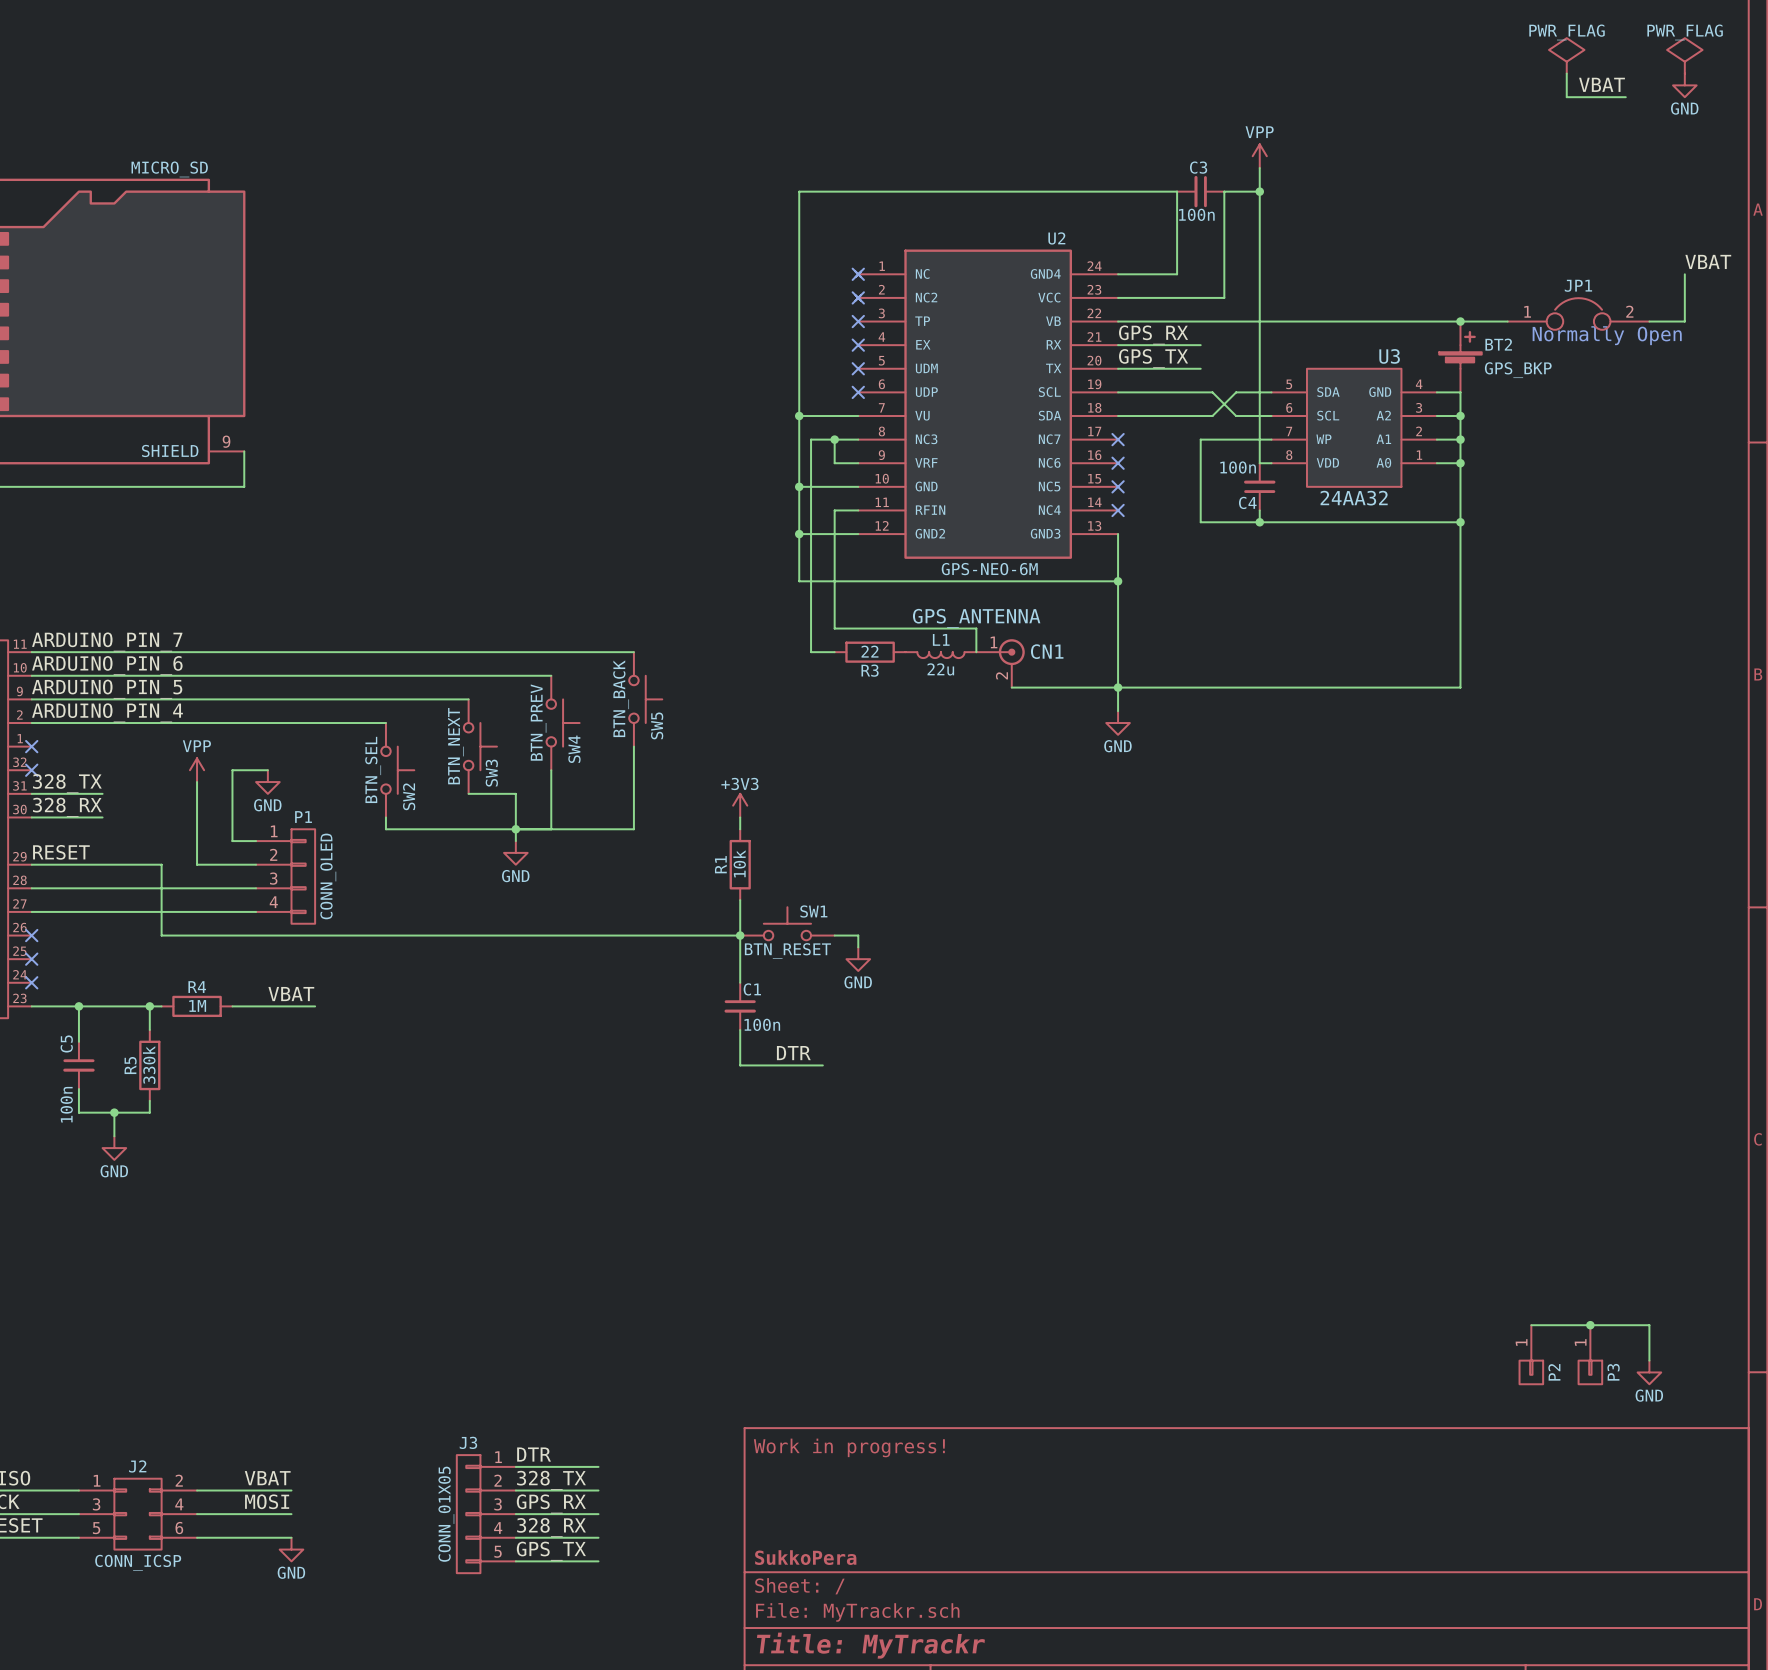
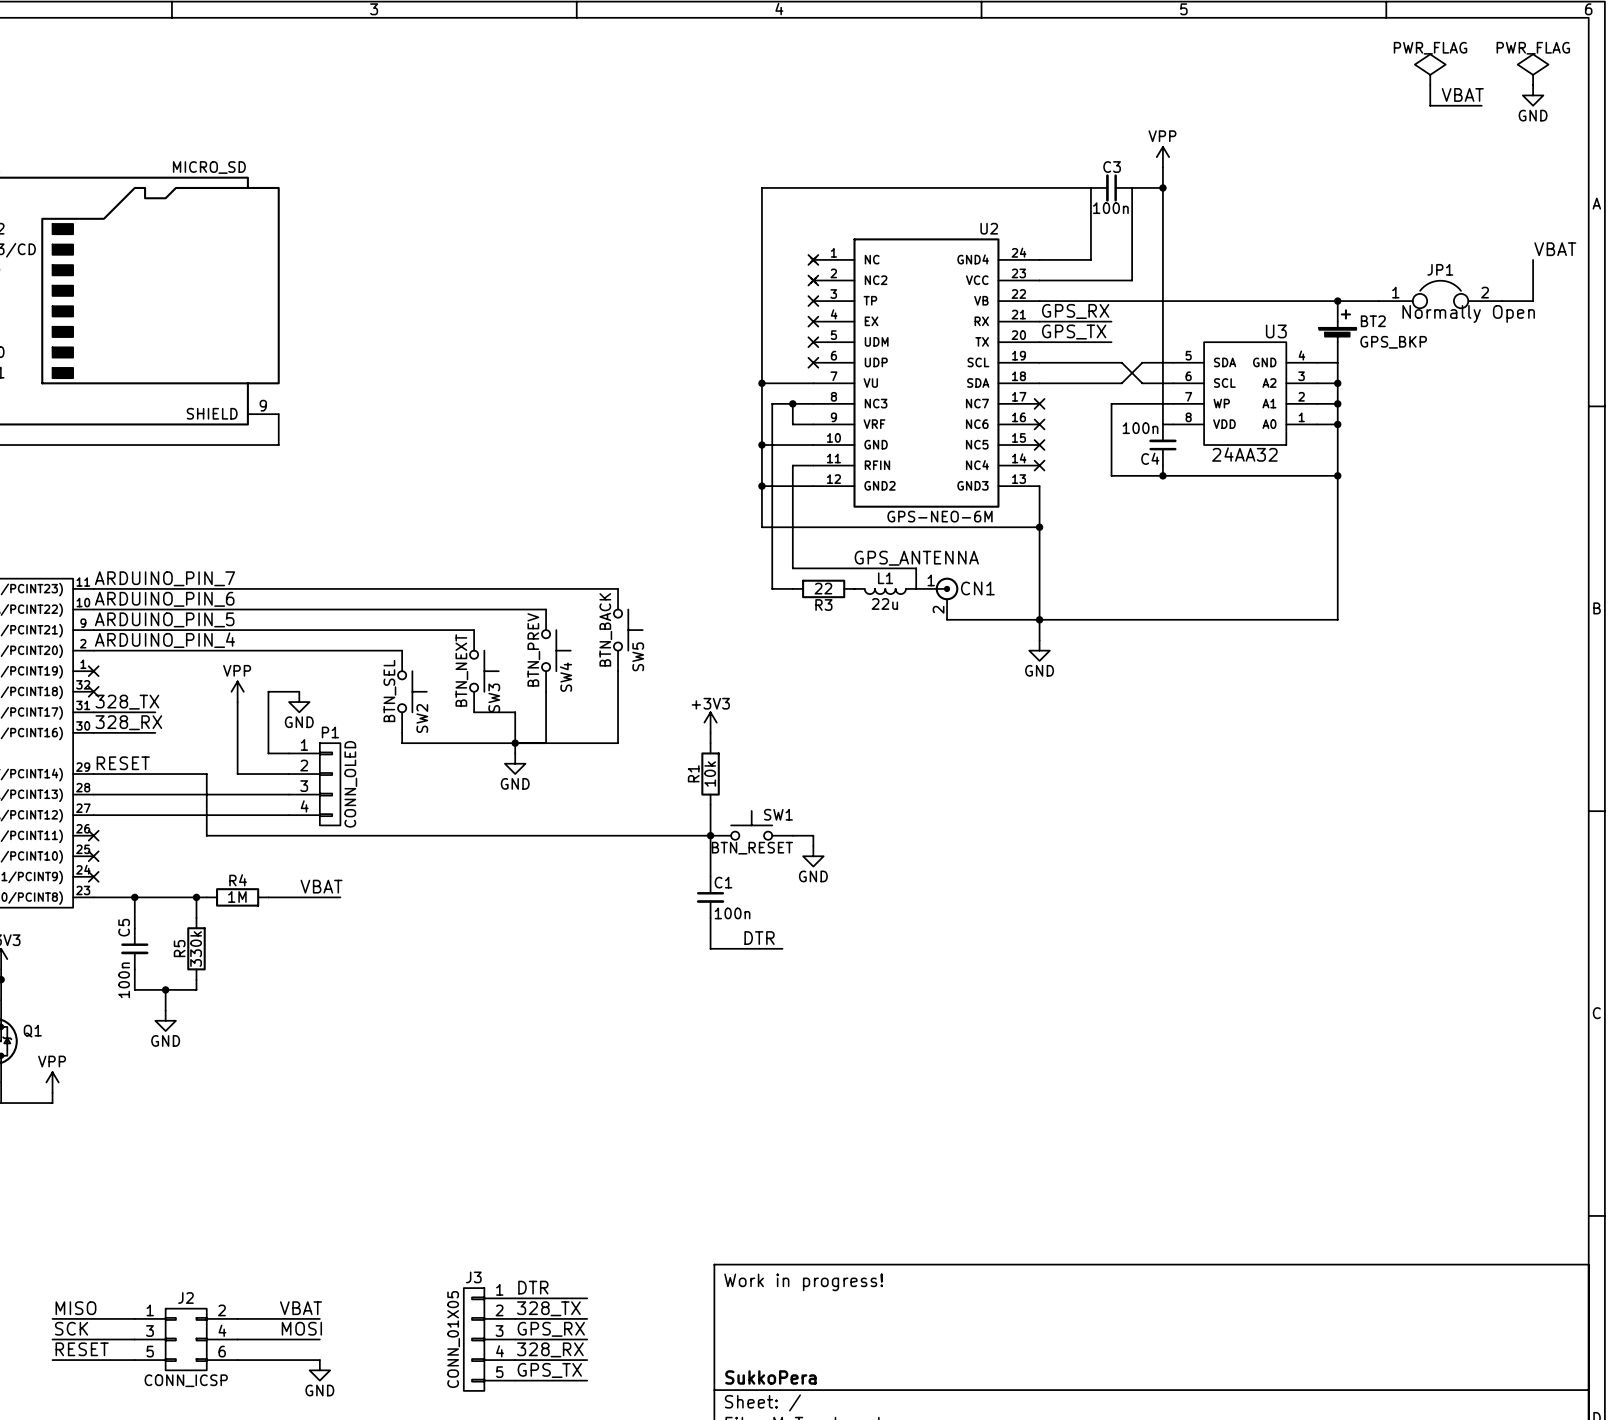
wire: (1531, 1325) (1649, 1325) (1649, 1360) -> none
junction: (1590, 1325) -> none
P2: (1531, 1354) -> none
P3: (1590, 1354) -> none
power symbol: GND (1649, 1372) -> none

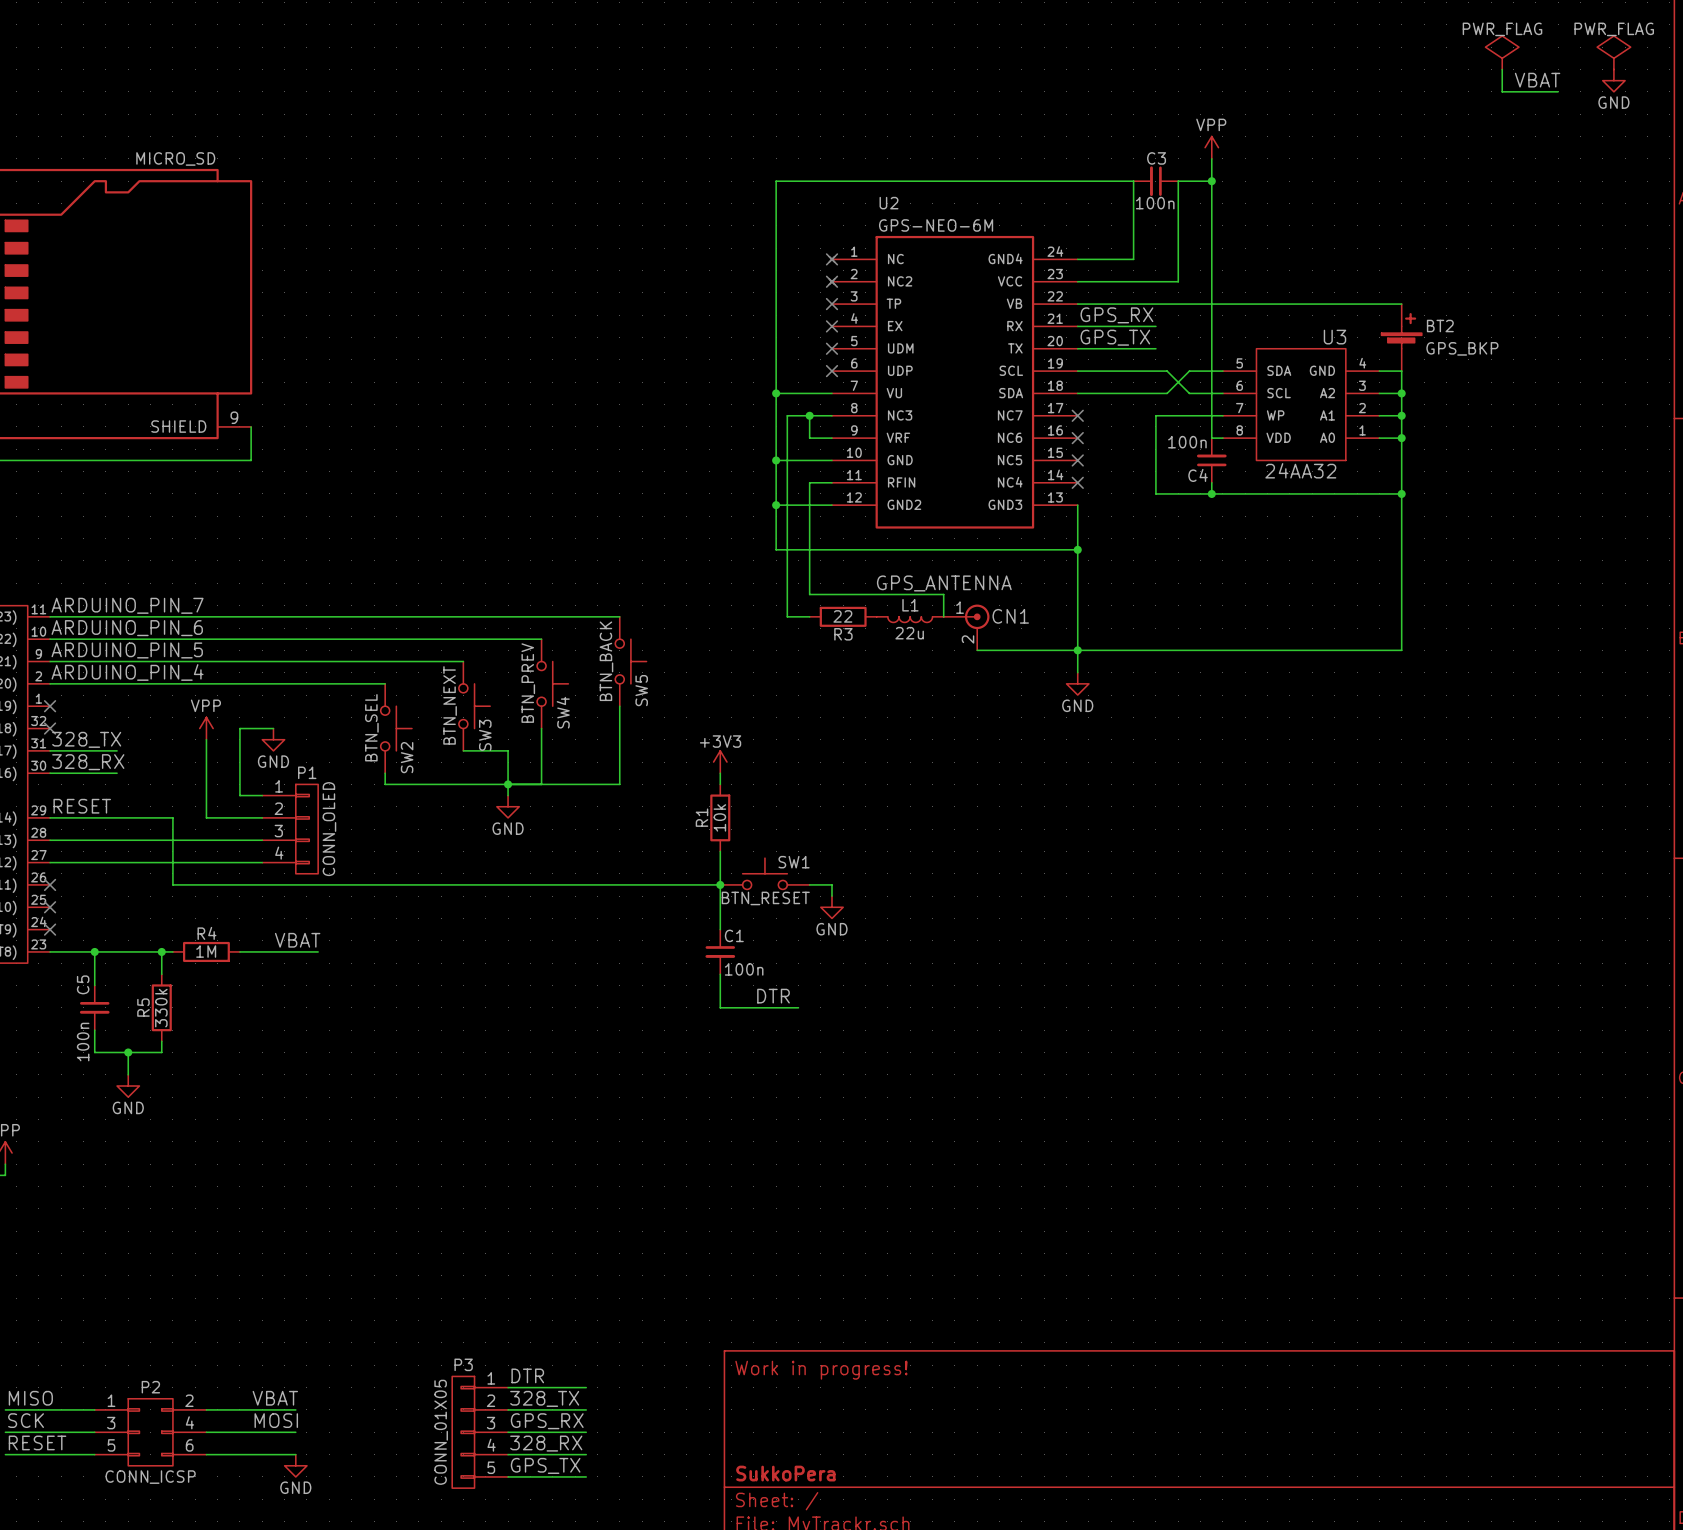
U2 name position: U2 (989, 228) -> U2 (888, 203)
label: VBAT (1555, 249) -> none
wire: (1533, 259) (1533, 301) (1502, 301) -> none
JP1: (1440, 294) -> none
wire: (1337, 301) (1378, 301) -> none
junction: (1337, 301) -> none
text: Normally Open (1468, 313) -> none
U2 value position: GPS-NEO-6M (940, 516) -> GPS-NEO-6M (936, 225)
J3 name: J3 (473, 1277) -> P3 (463, 1364)
J2 name: J2 (185, 1297) -> P2 (150, 1387)

